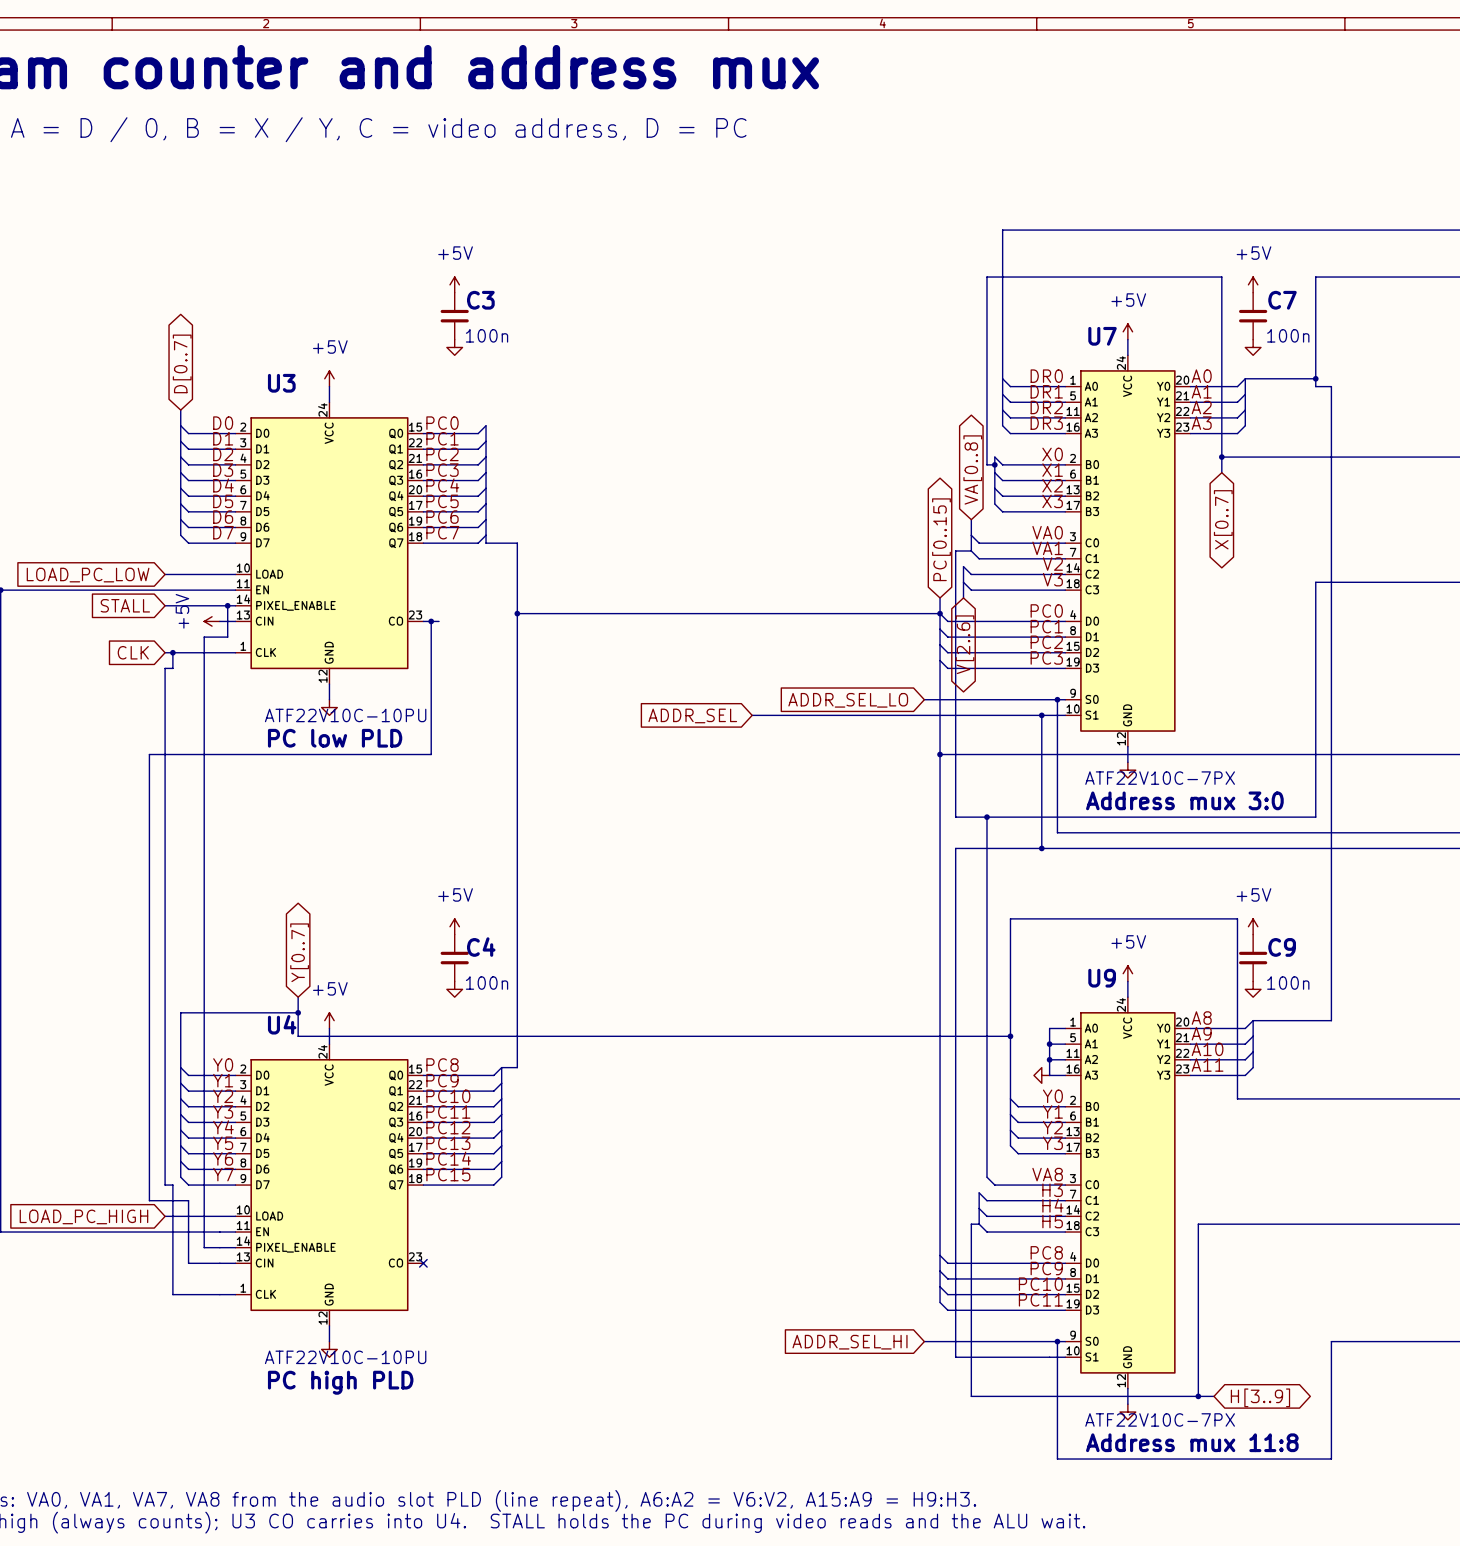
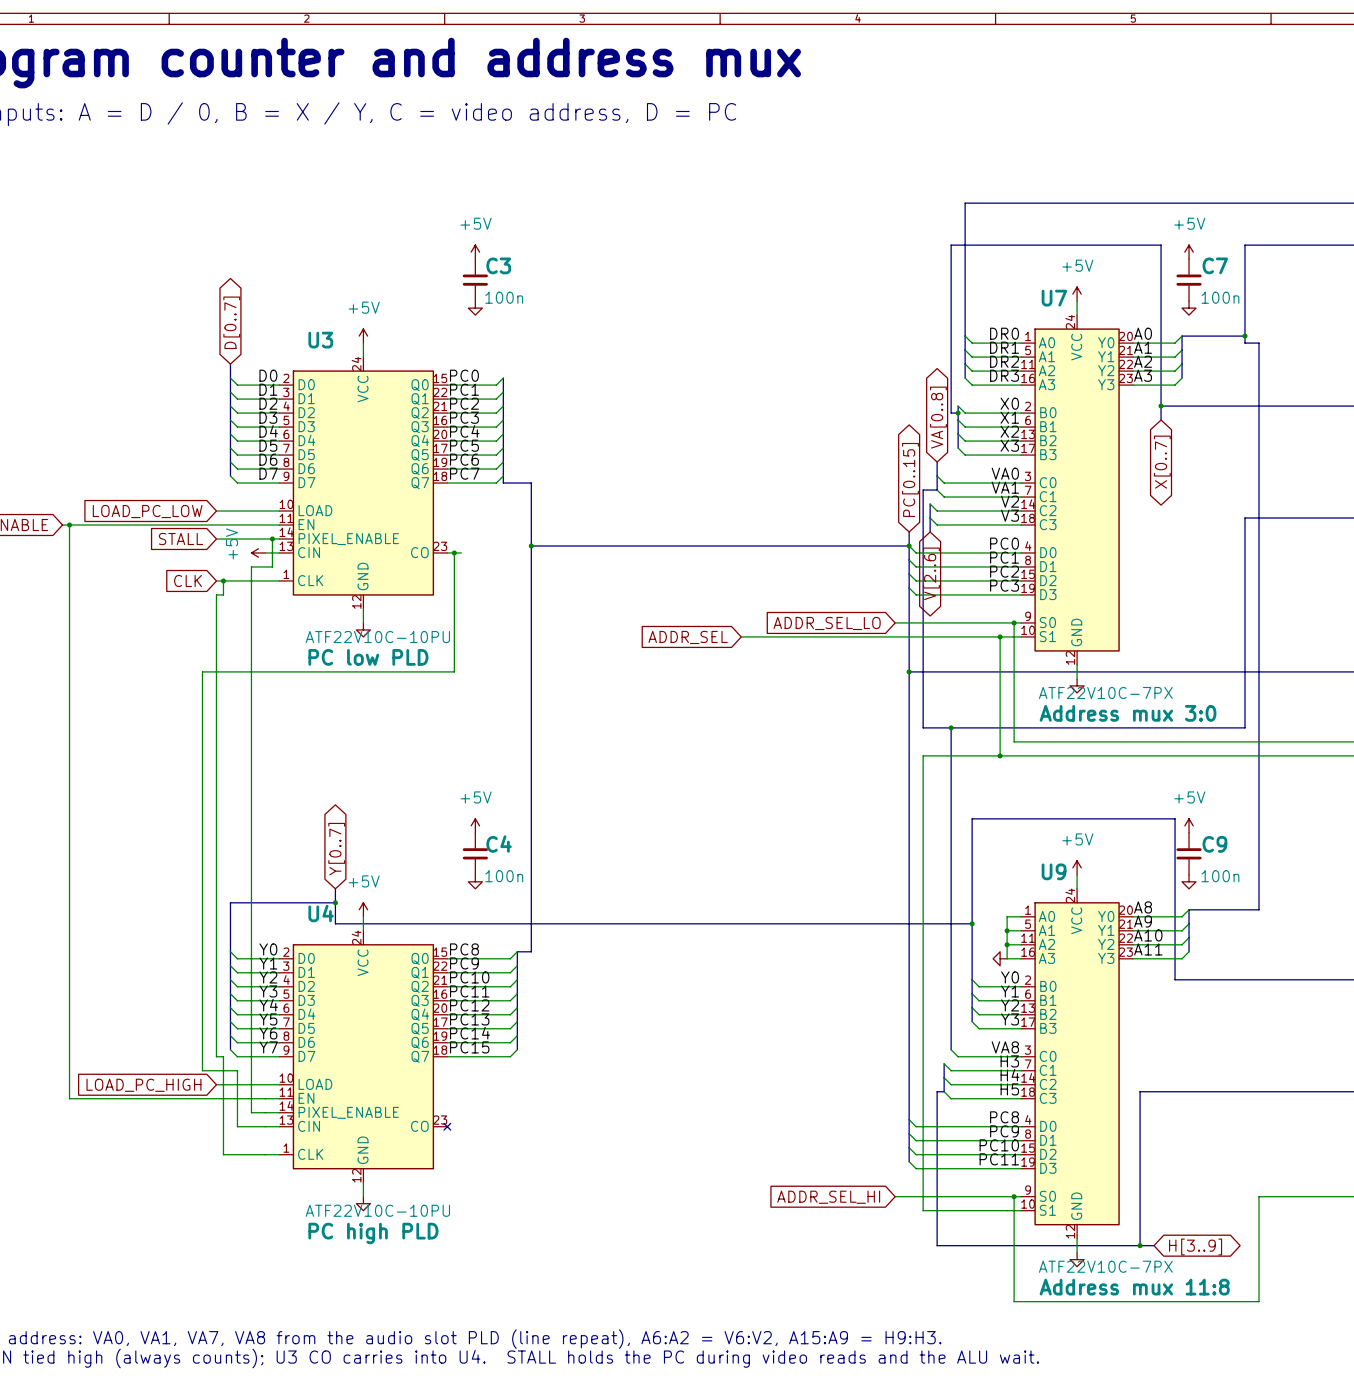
U7 symbol: [1065, 355, 1191, 747] -> [1021, 315, 1134, 665]
U3 symbol: [235, 402, 424, 685] -> [279, 357, 448, 609]
U9 symbol: [1065, 997, 1191, 1389] -> [1021, 888, 1134, 1239]
U4 symbol: [235, 1044, 424, 1326] -> [279, 930, 448, 1183]

